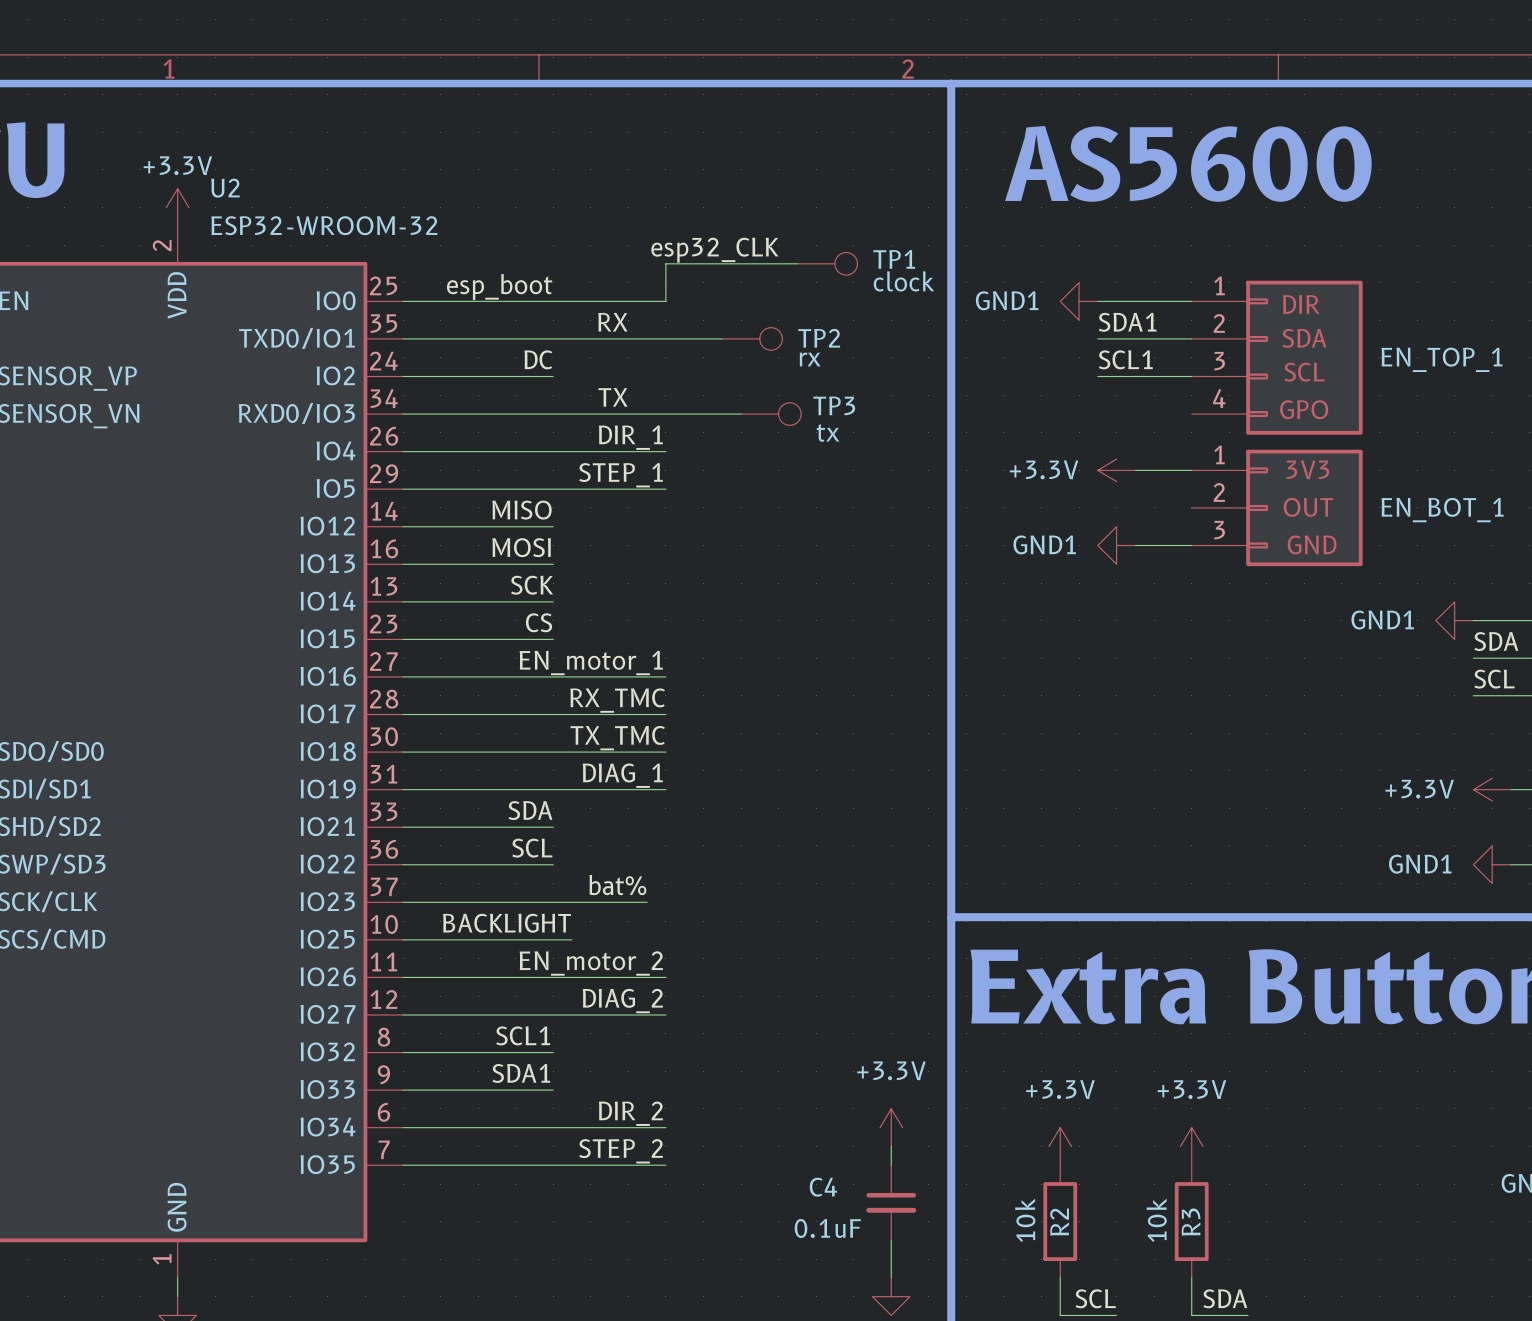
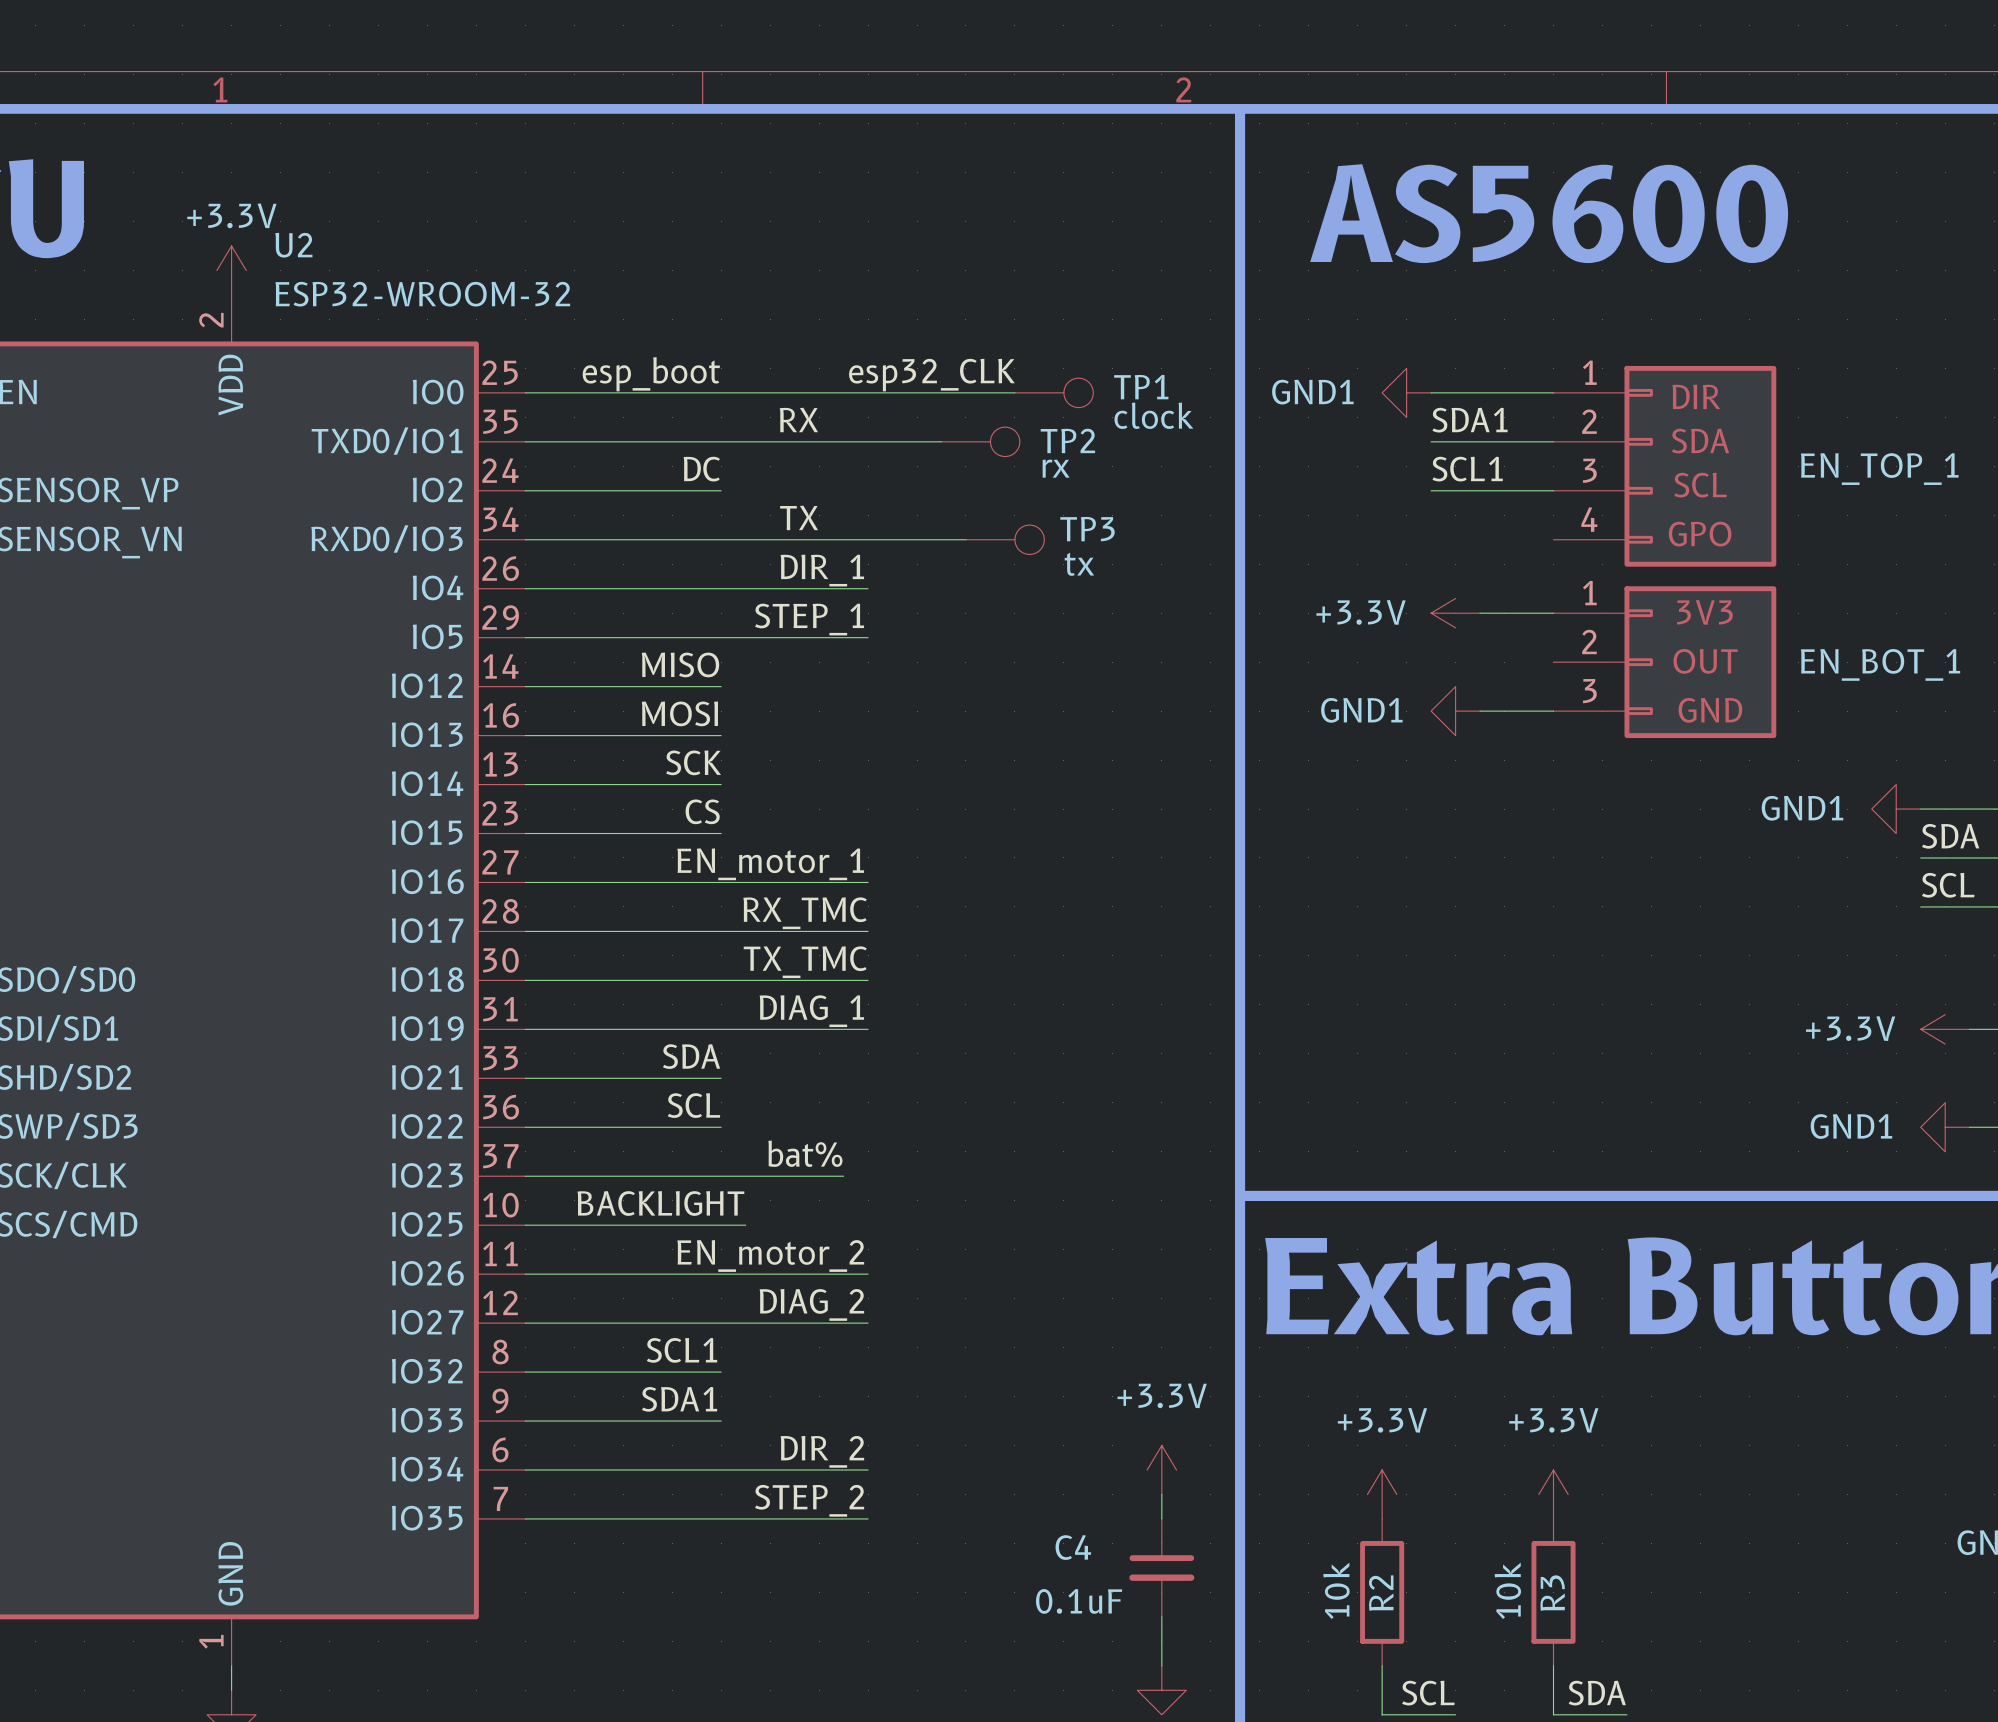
label position: esp32_CLK (714, 250) -> esp32_CLK (931, 375)
wire: (797, 263) (665, 263) (665, 301) -> (1014, 392) (868, 392)
TP1 position: (827, 263) -> (1054, 392)

